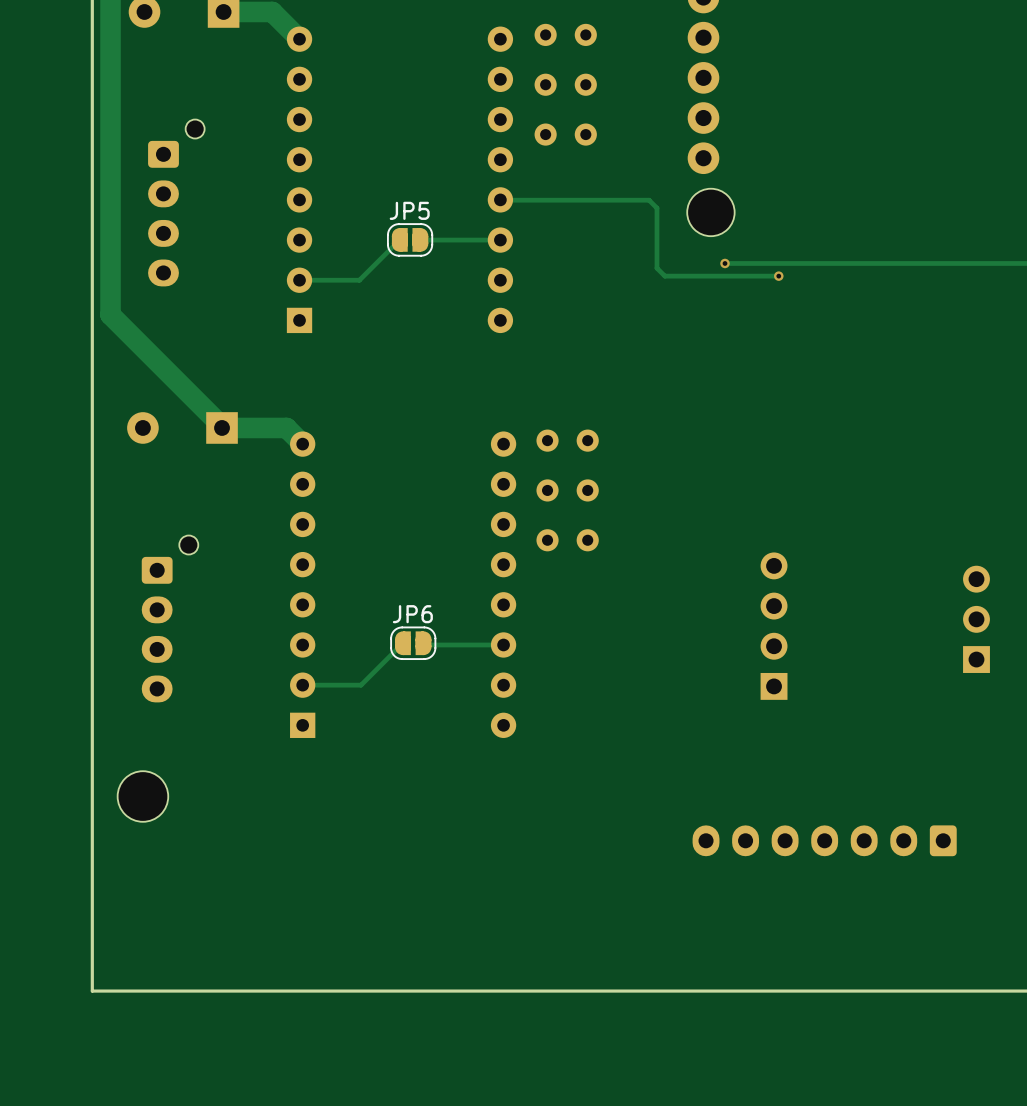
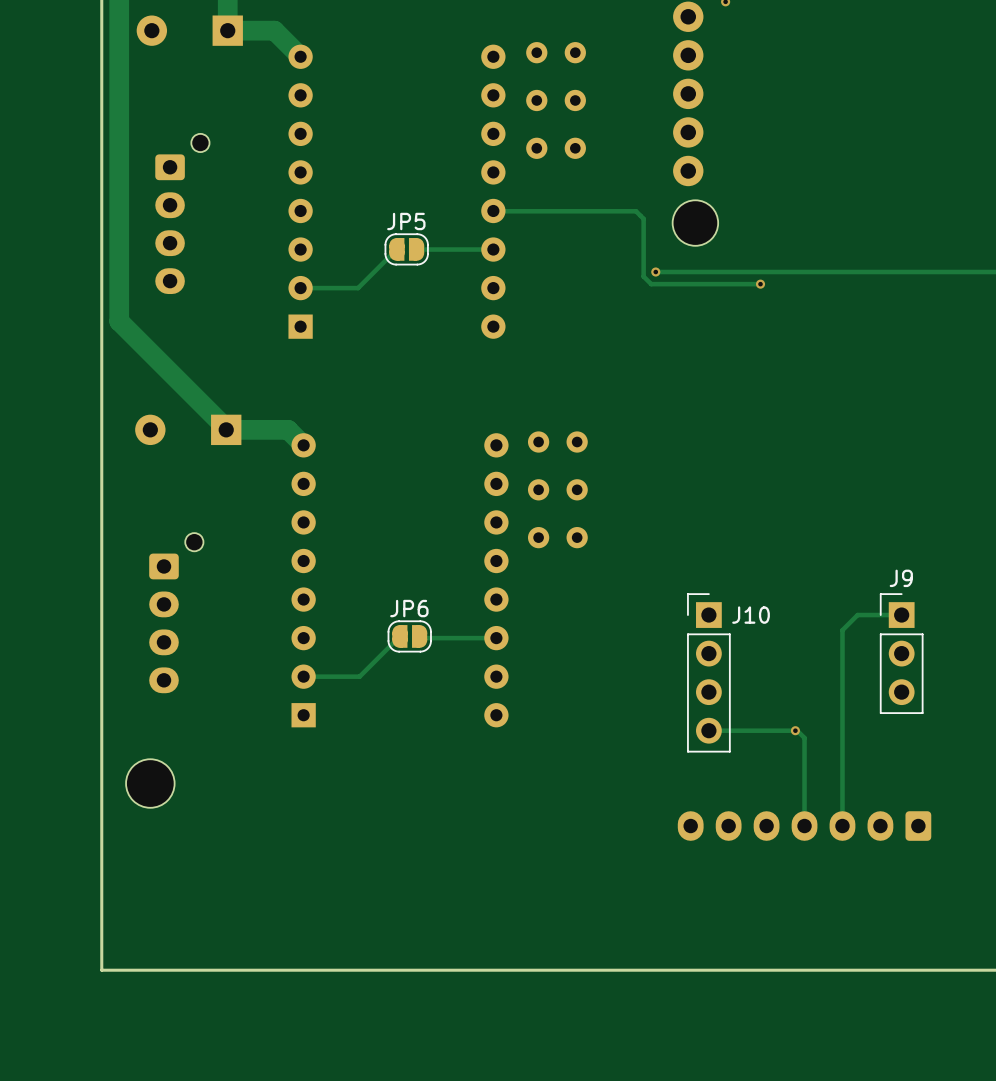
track: none -> (708, 272) (655, 272)
via position: (725, 263) -> (655, 272)
J9 side: top (976, 619) -> bottom (901, 653)
track: none -> (901, 615) (857, 615) (842, 630) (842, 826)
J10 side: top (774, 626) -> bottom (708, 672)
track: none -> (708, 730) (797, 730) (804, 737) (804, 826)
via: none -> (795, 730)

